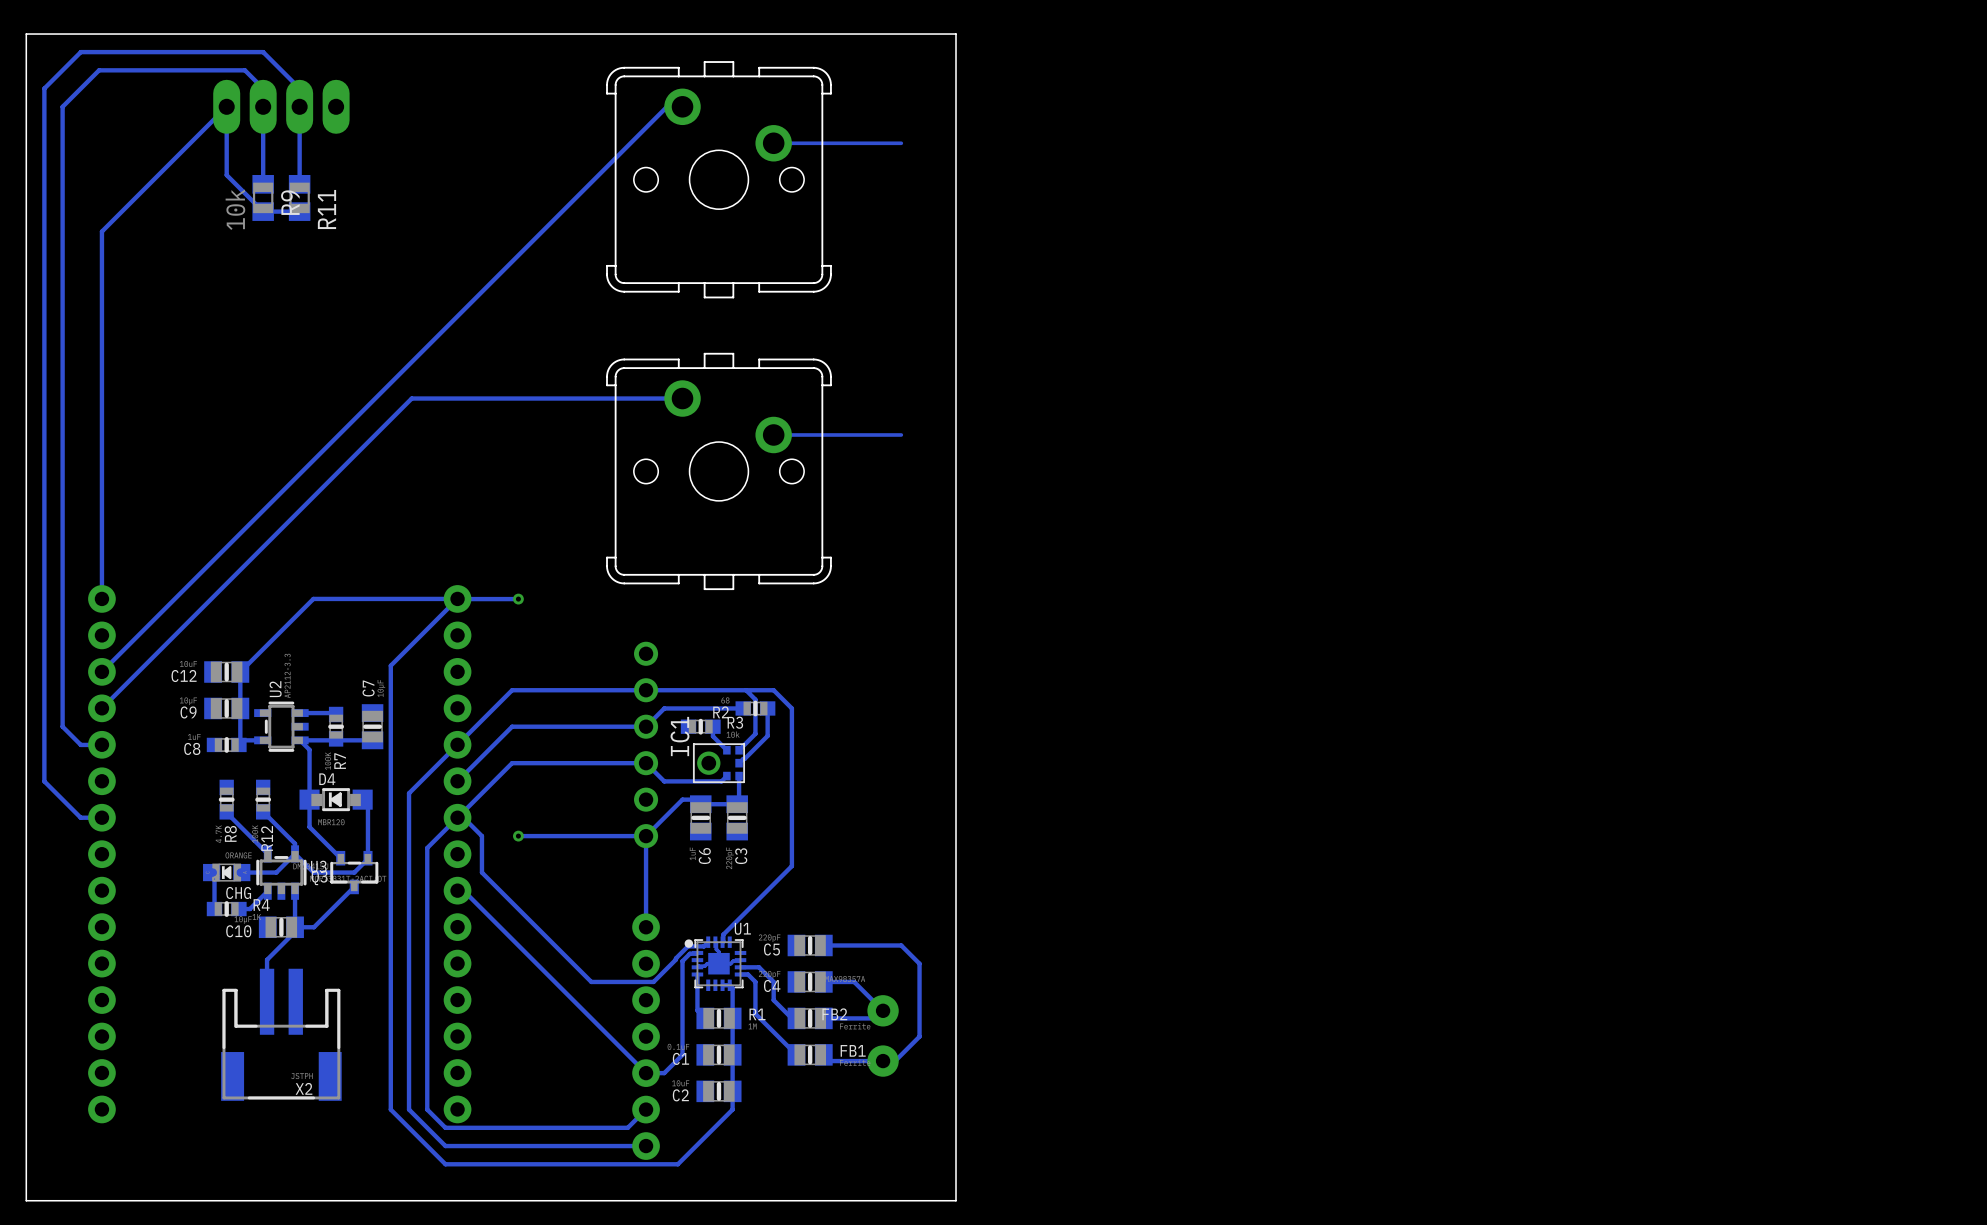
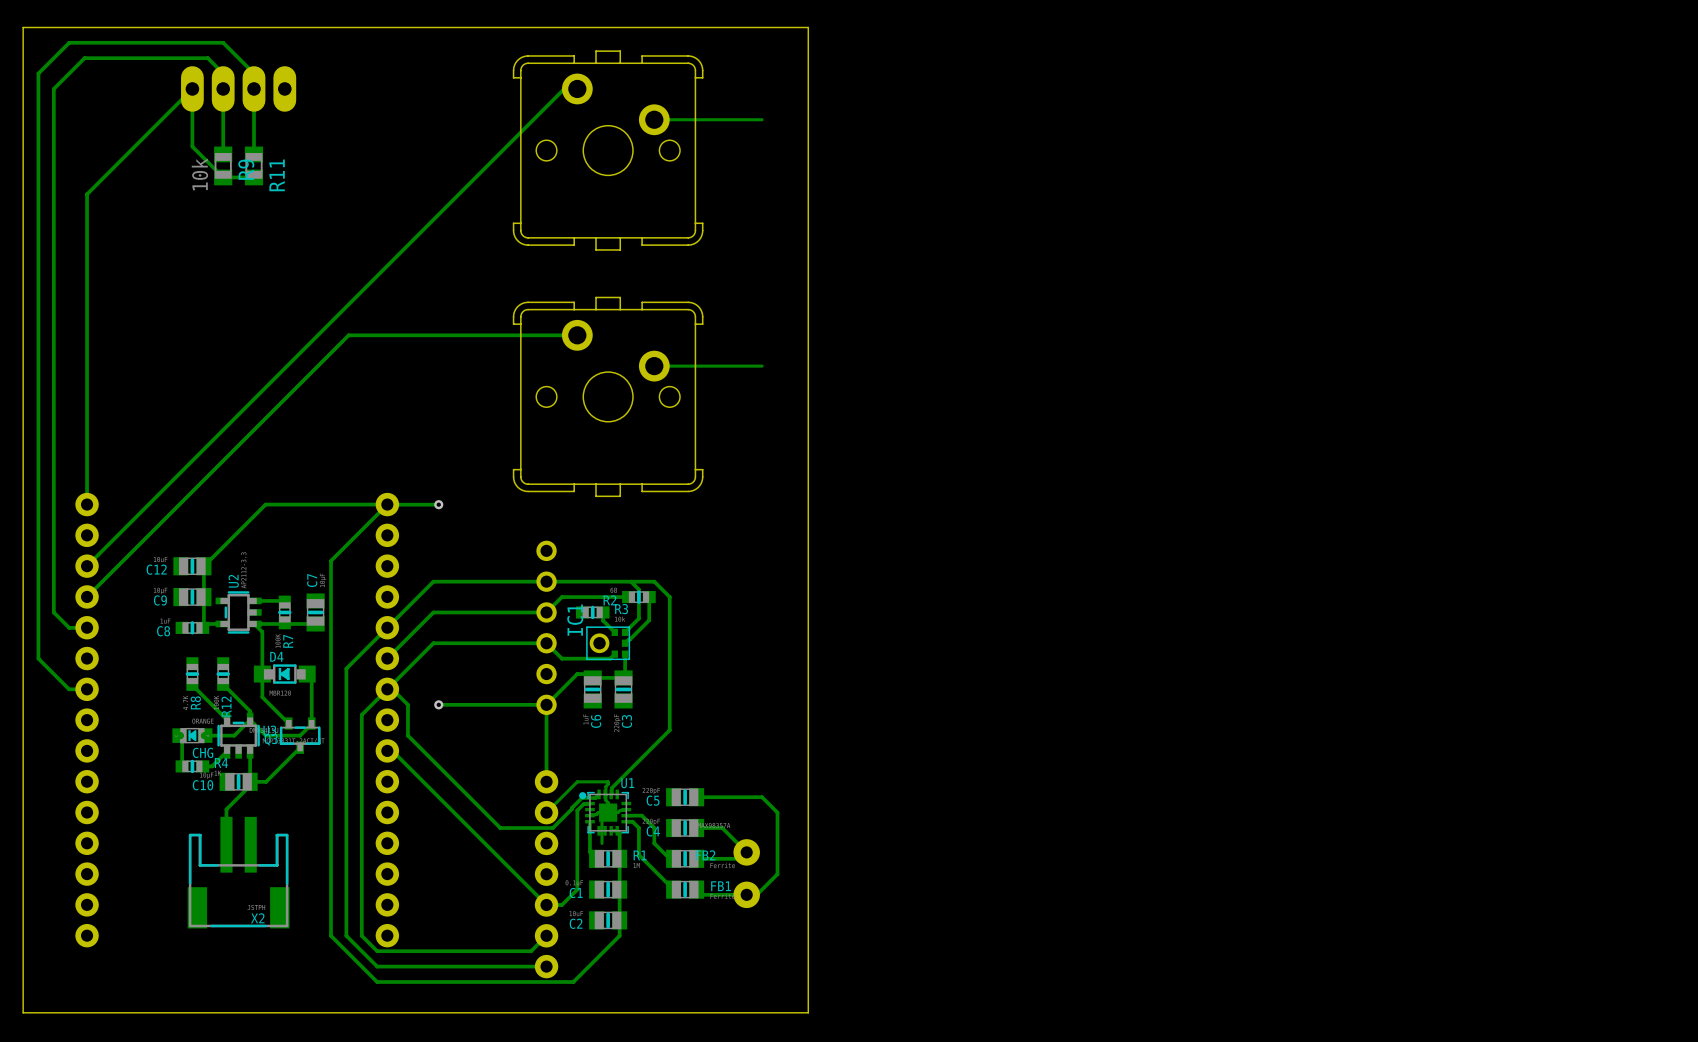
track: none -> (605, 795) (608, 781) (577, 781) (546, 812)
track: none -> (608, 812) (601, 818) (601, 843)

